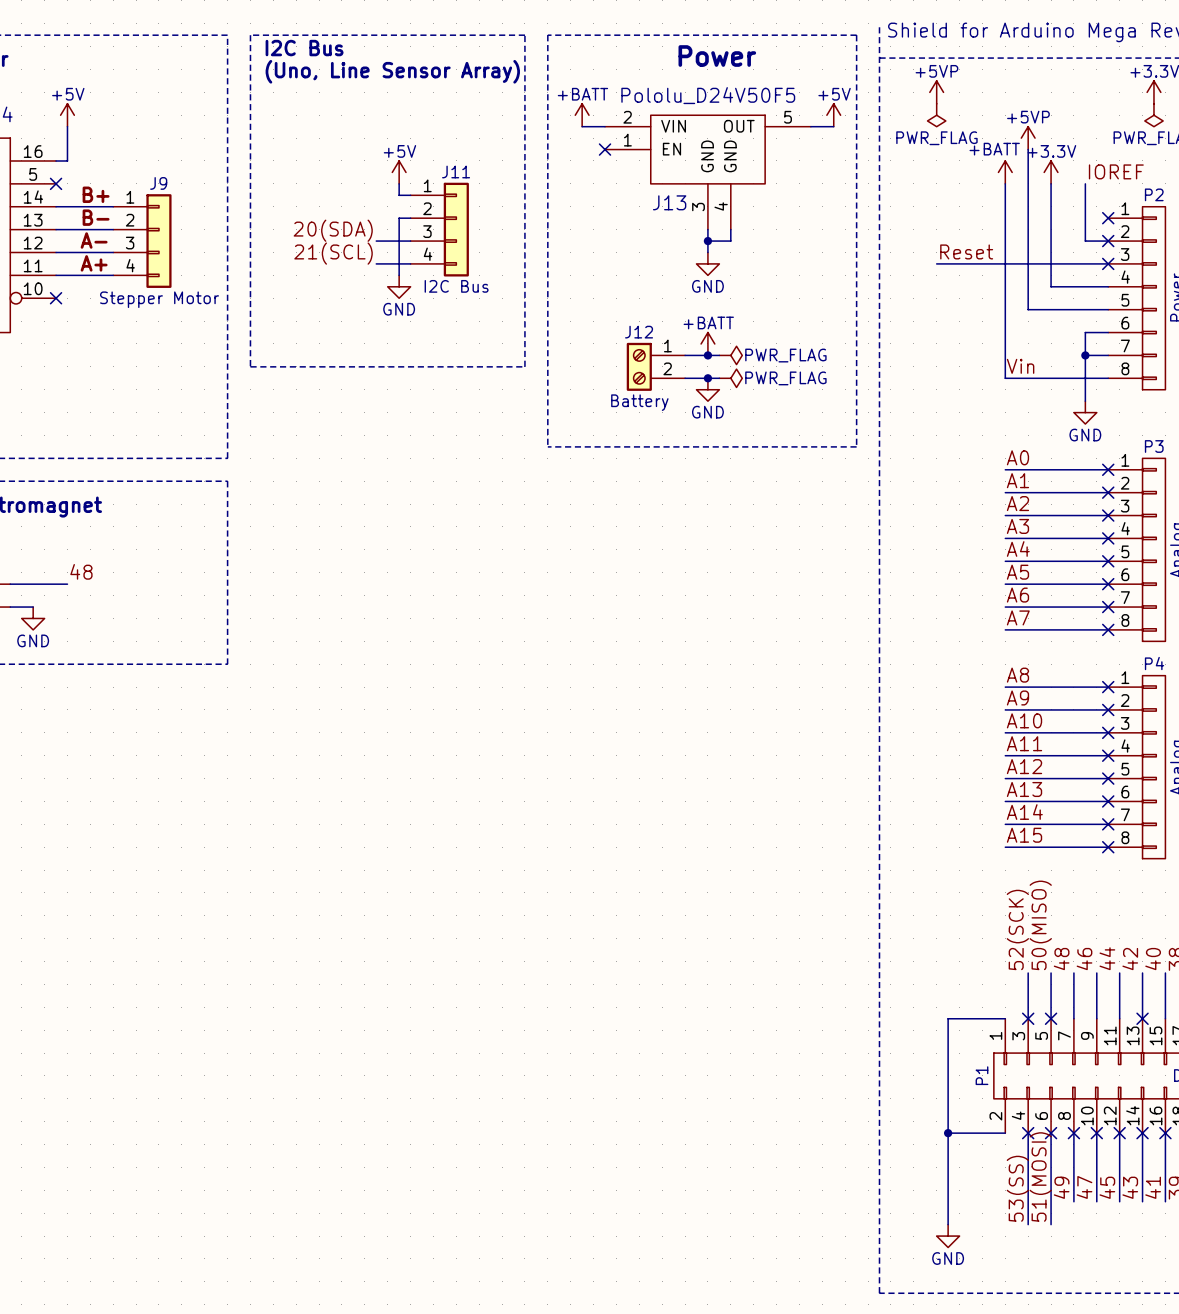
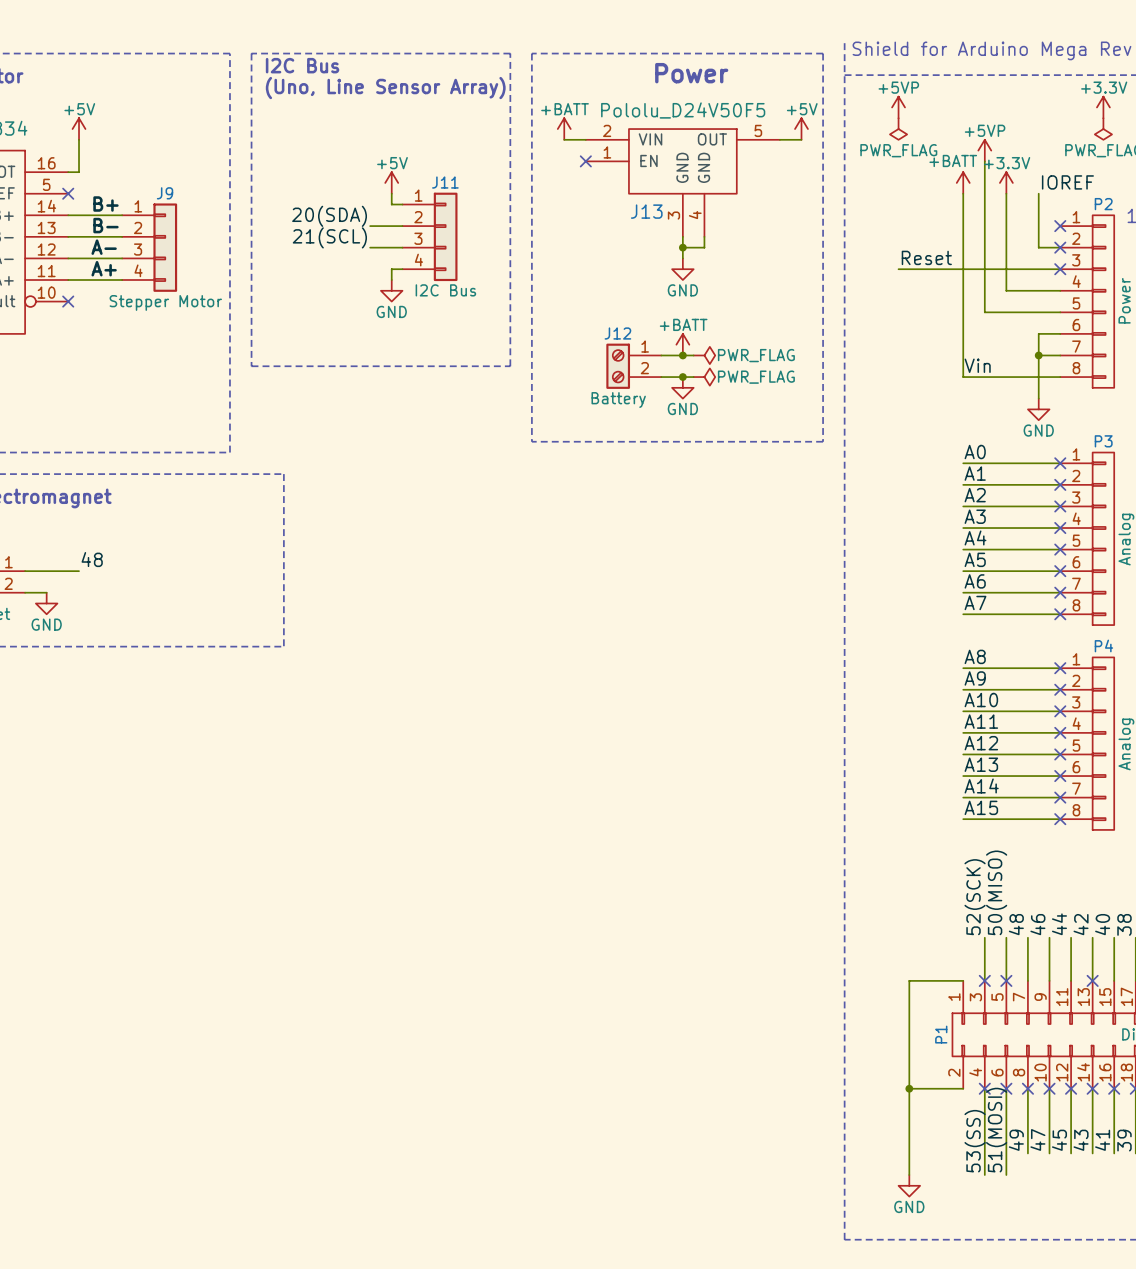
label: none -> 20(SDA) (329, 216)
wire: (399, 218) (399, 263) (376, 263) -> (391, 226) (370, 226)
label: 20(SDA) (333, 230) -> 21(SCL) (329, 237)
label: 21(SCL) (333, 253) -> none
line: (227, 481) (227, 664) -> (229, 474) (283, 474) (283, 646) (229, 646)

